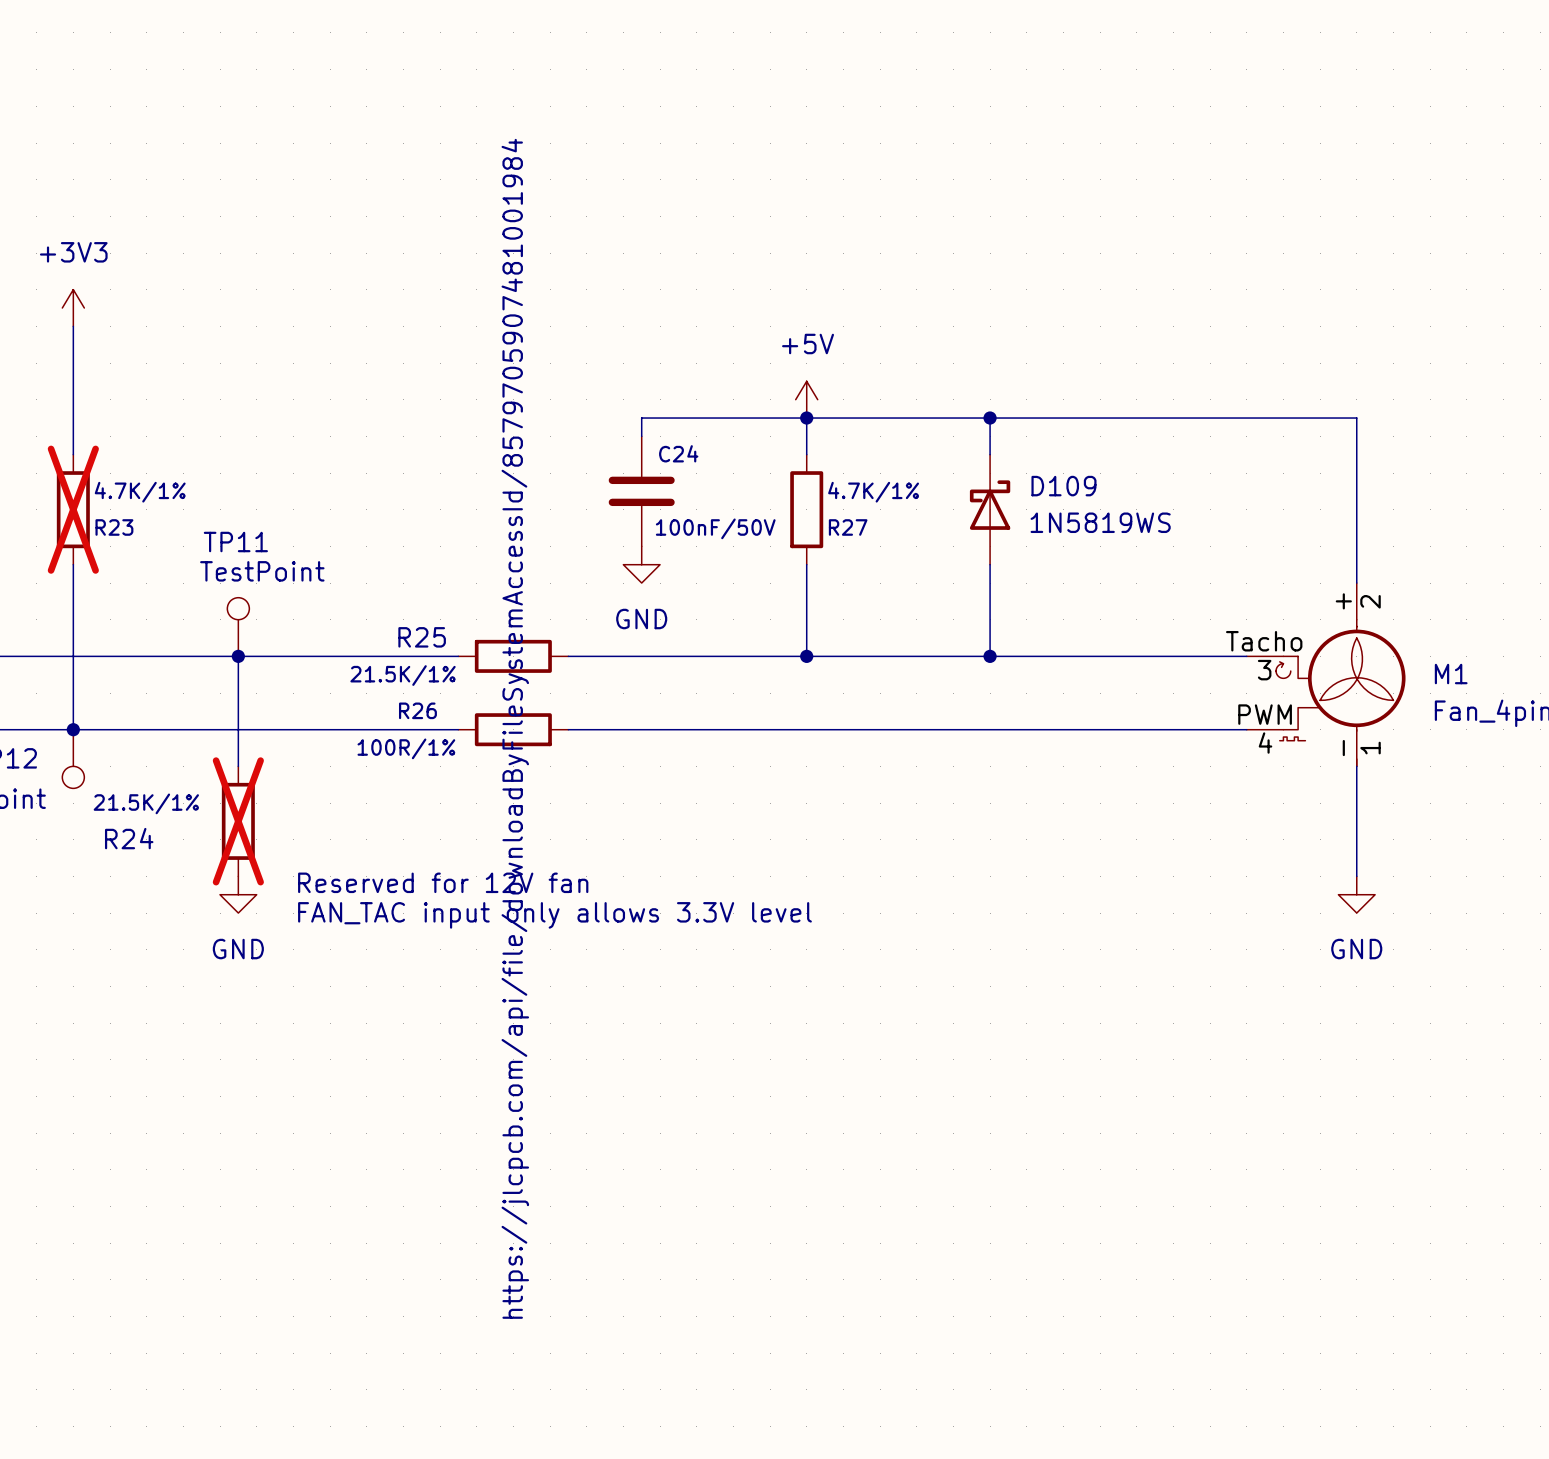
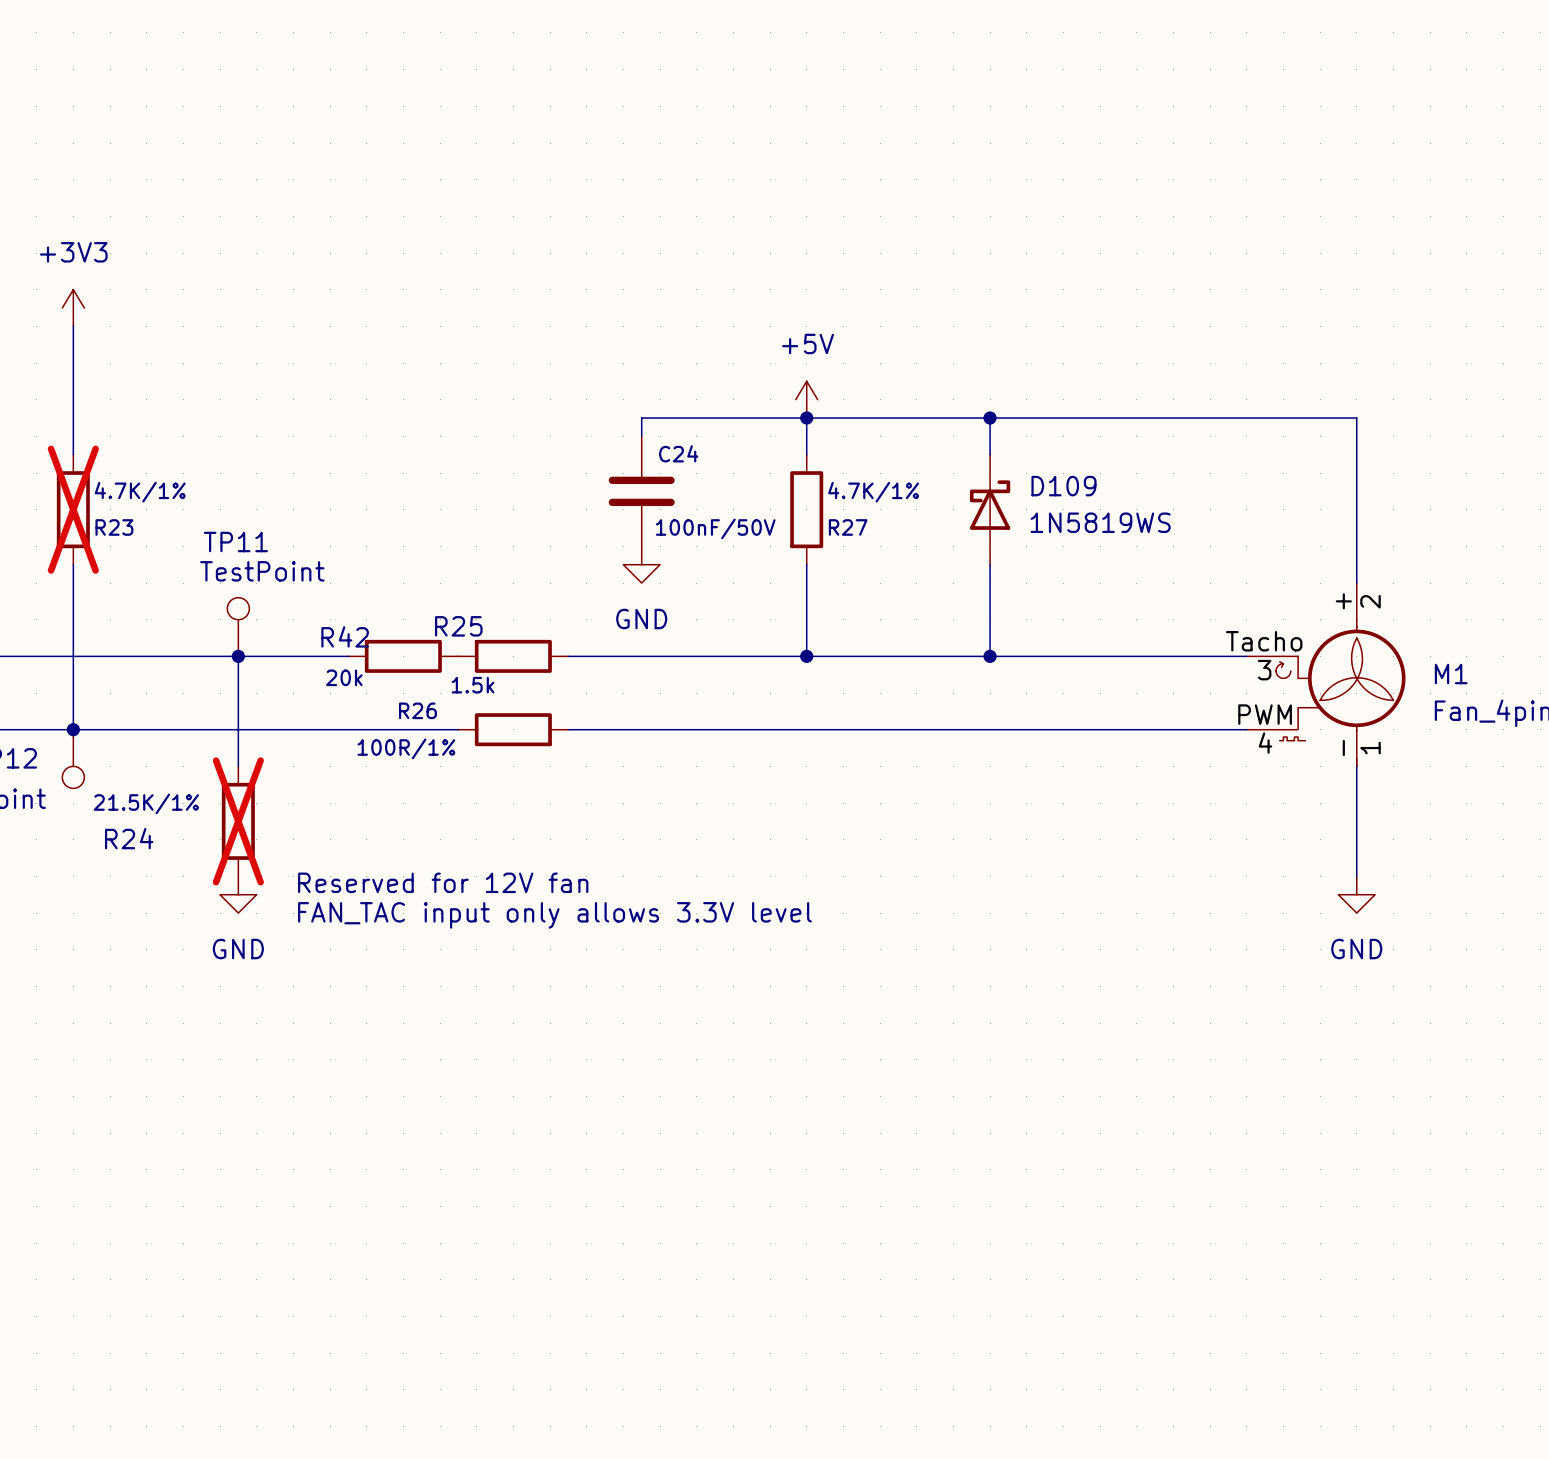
R25 name position: R25 (422, 637) -> R25 (458, 626)
wire: (348, 656) (458, 656) -> none
R42: none -> 20k (403, 656)
R25 value: 21.5K/1% (403, 675) -> 1.5k (473, 685)
R26 text: https://jlcpcb.com/api/file/downloadByFileSystemAccessId/8579705907481001984 (515, 728) -> none

